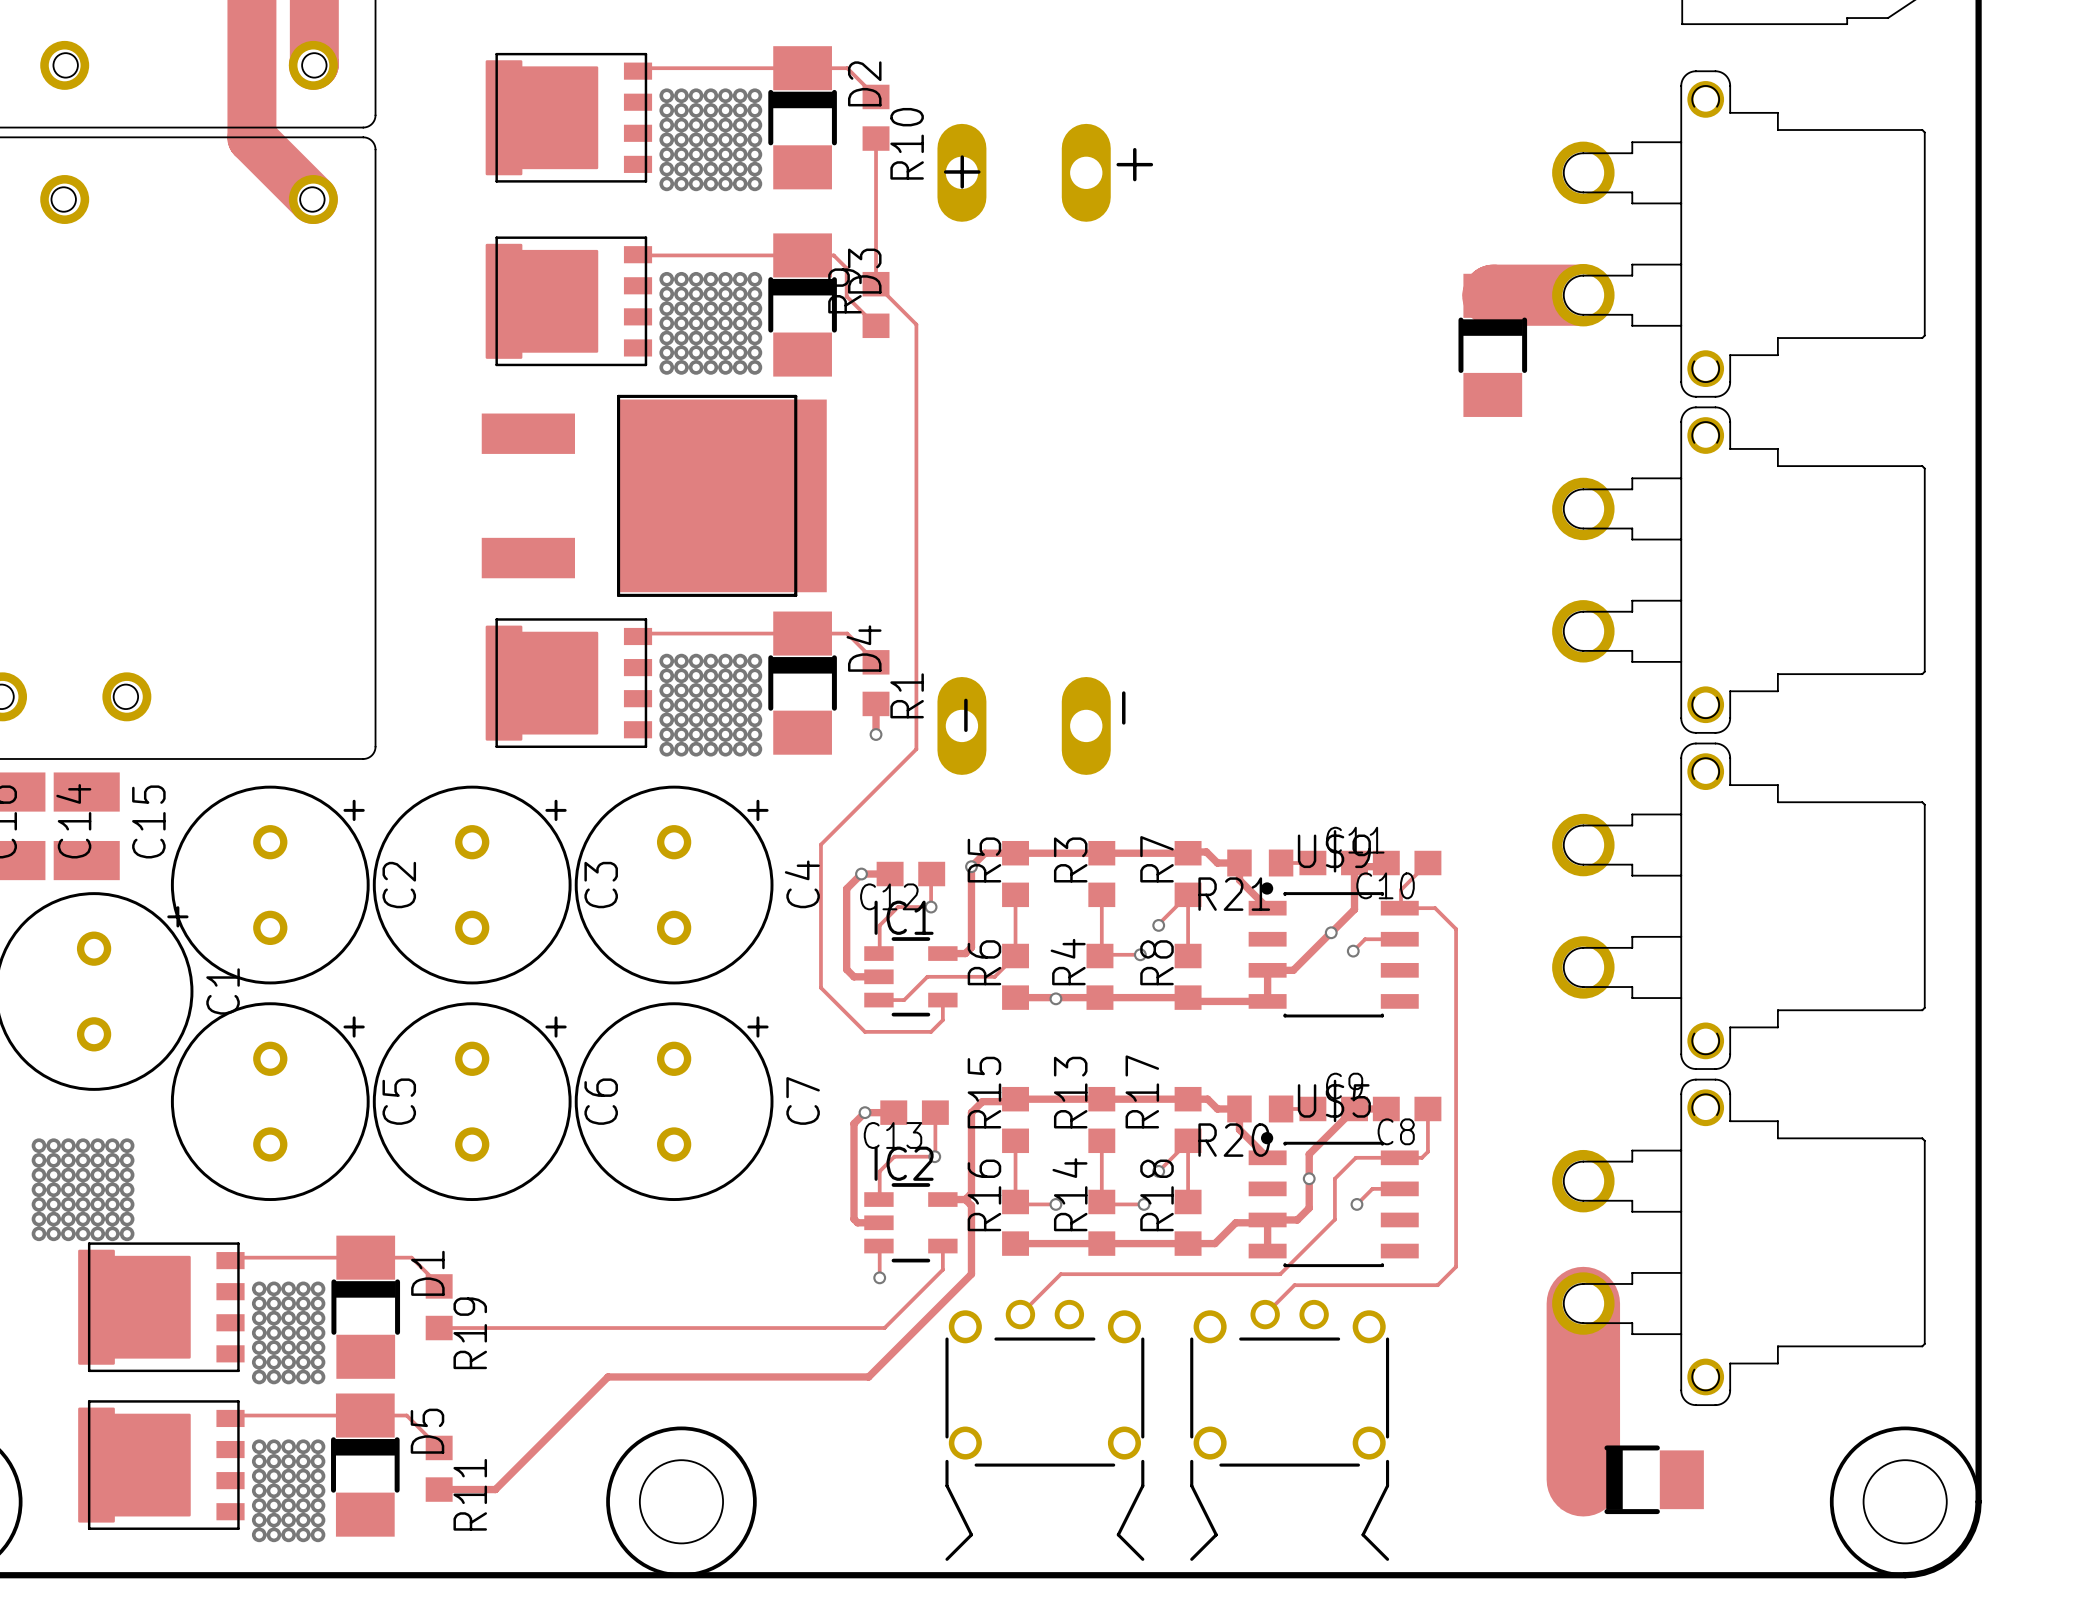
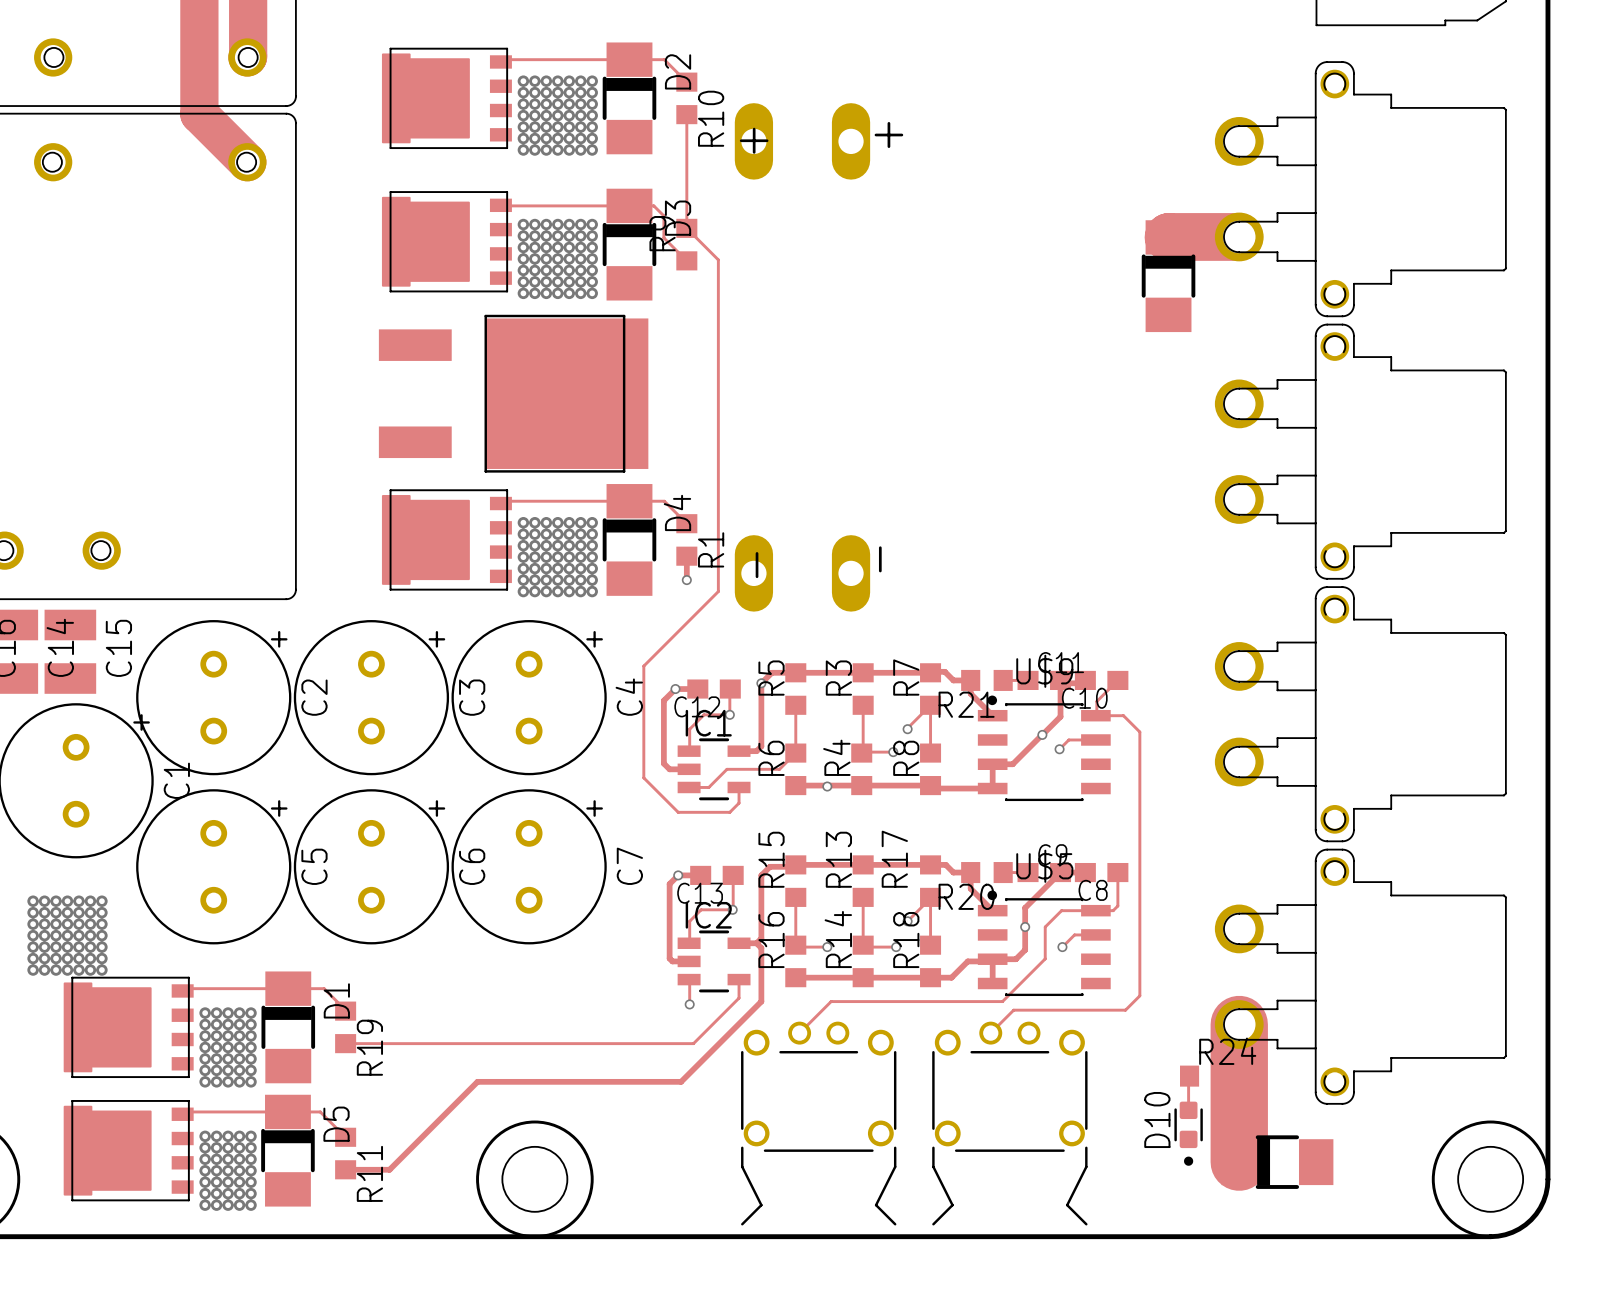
track: none -> (1189, 1076) (1188, 1110)
R24: none -> (1205, 1076)
D10: none -> (1188, 1133)

